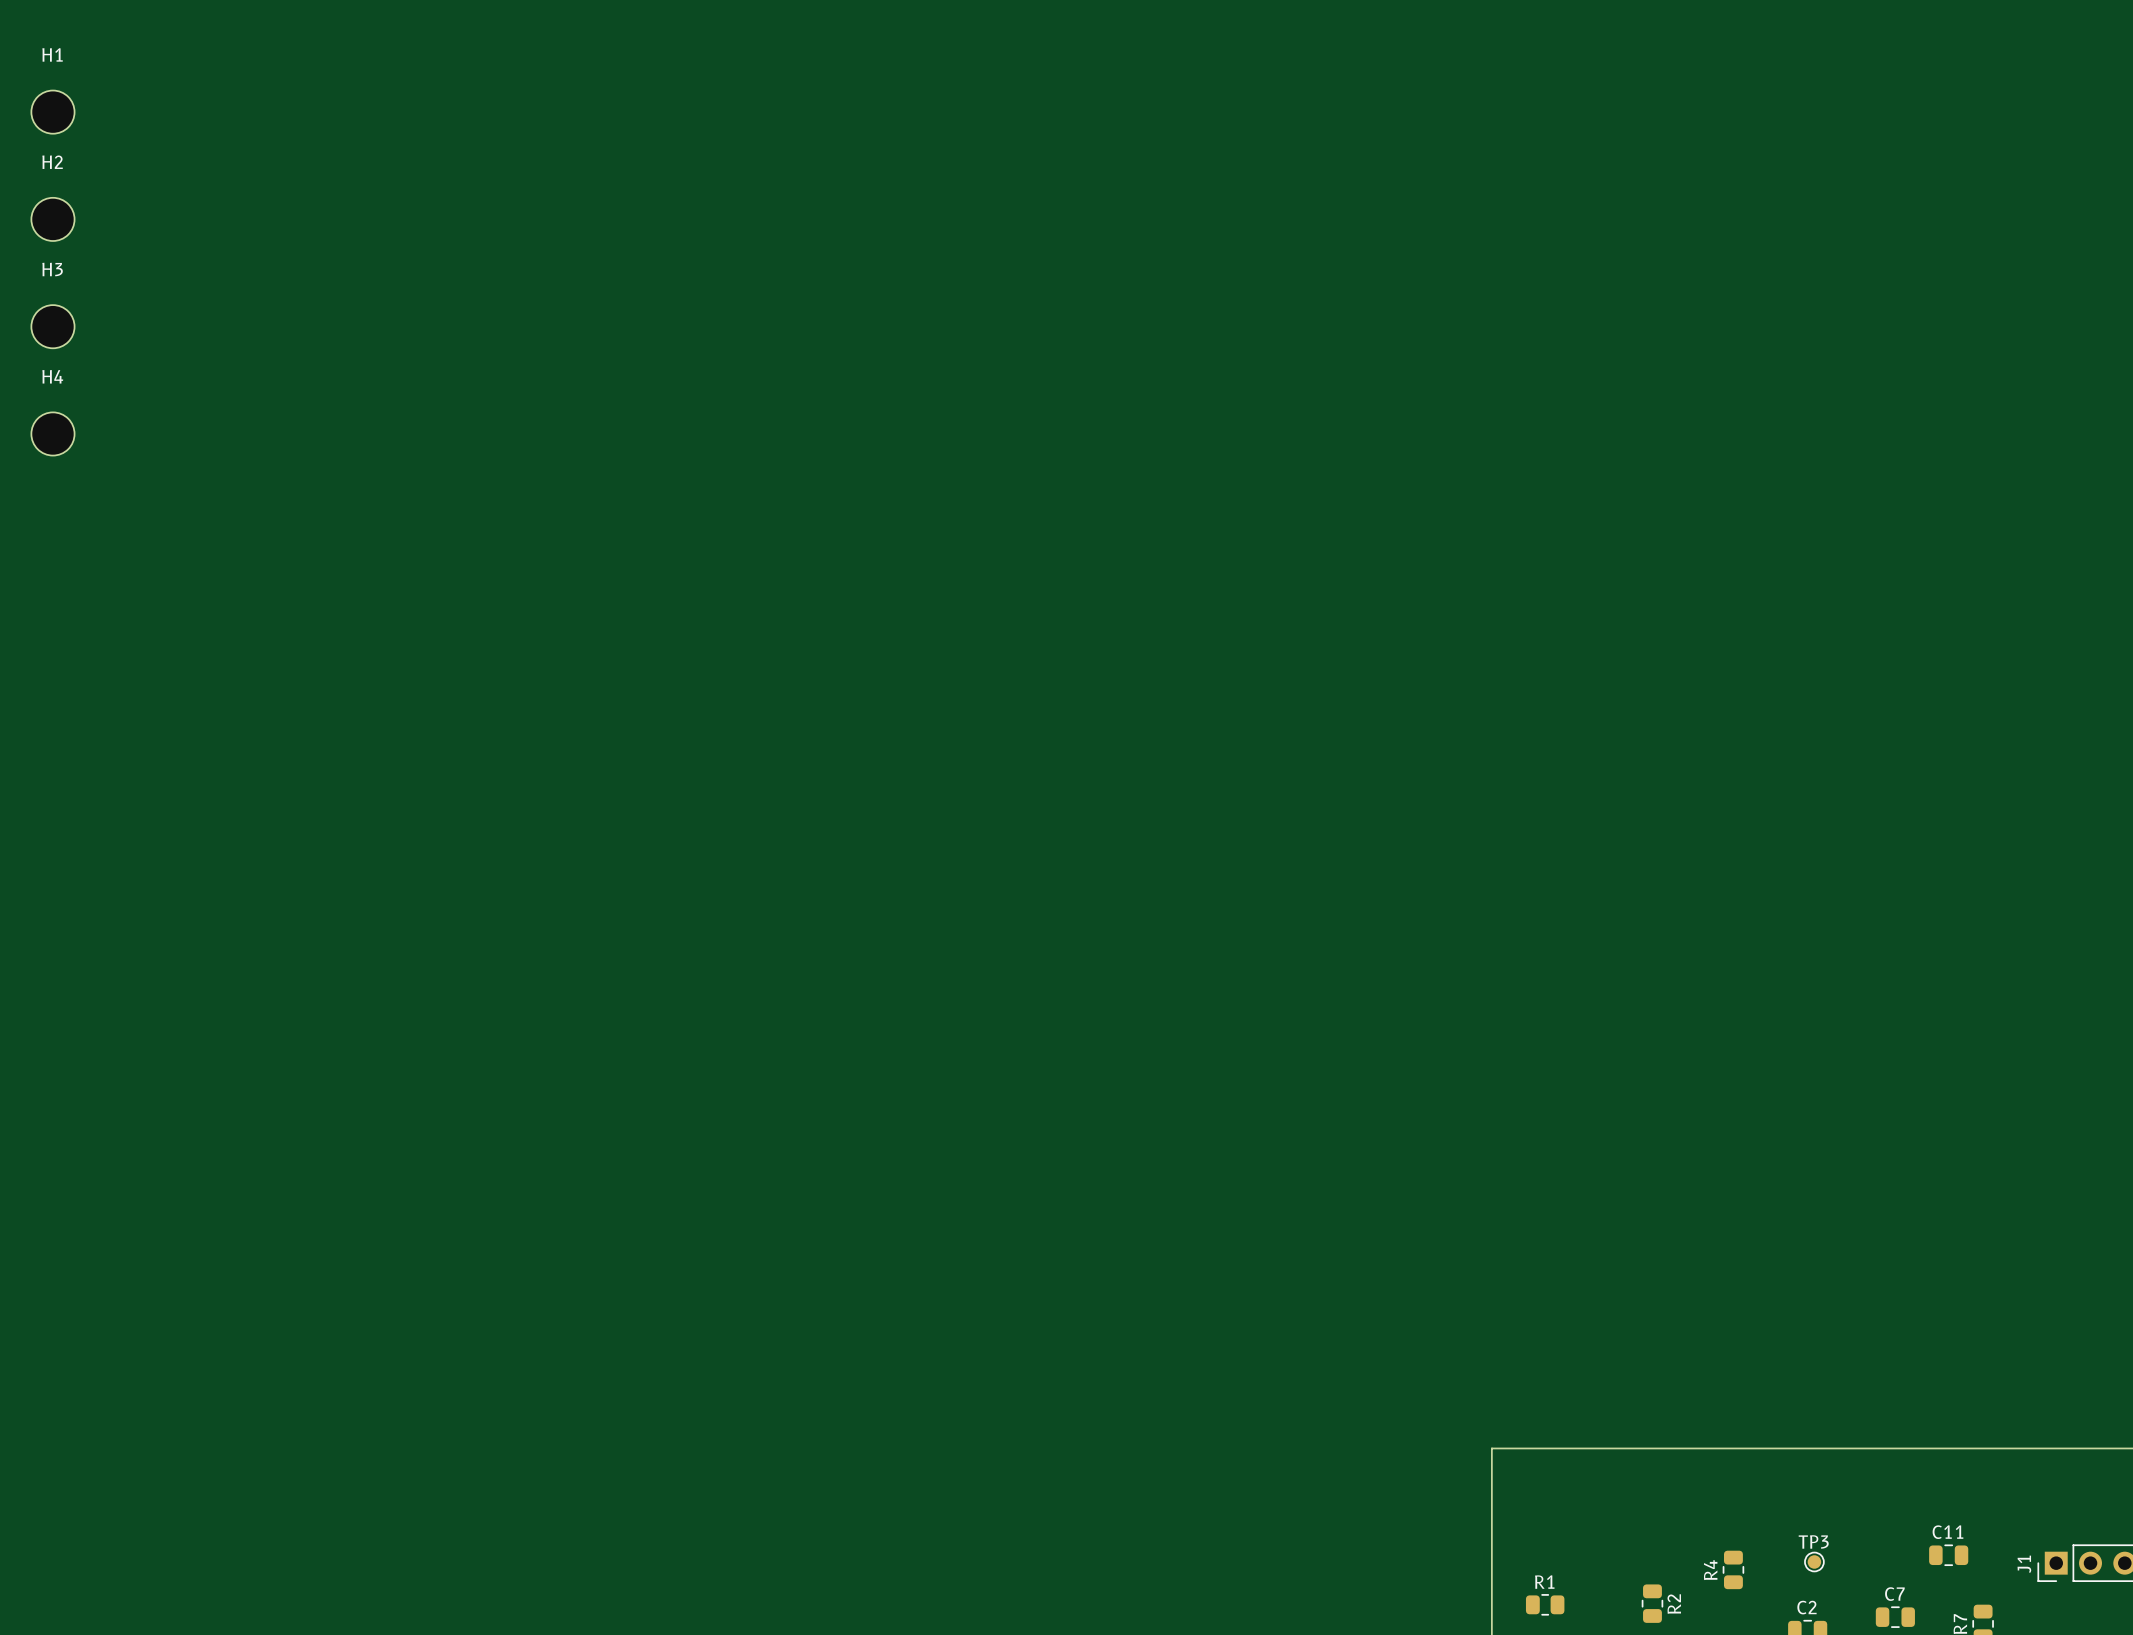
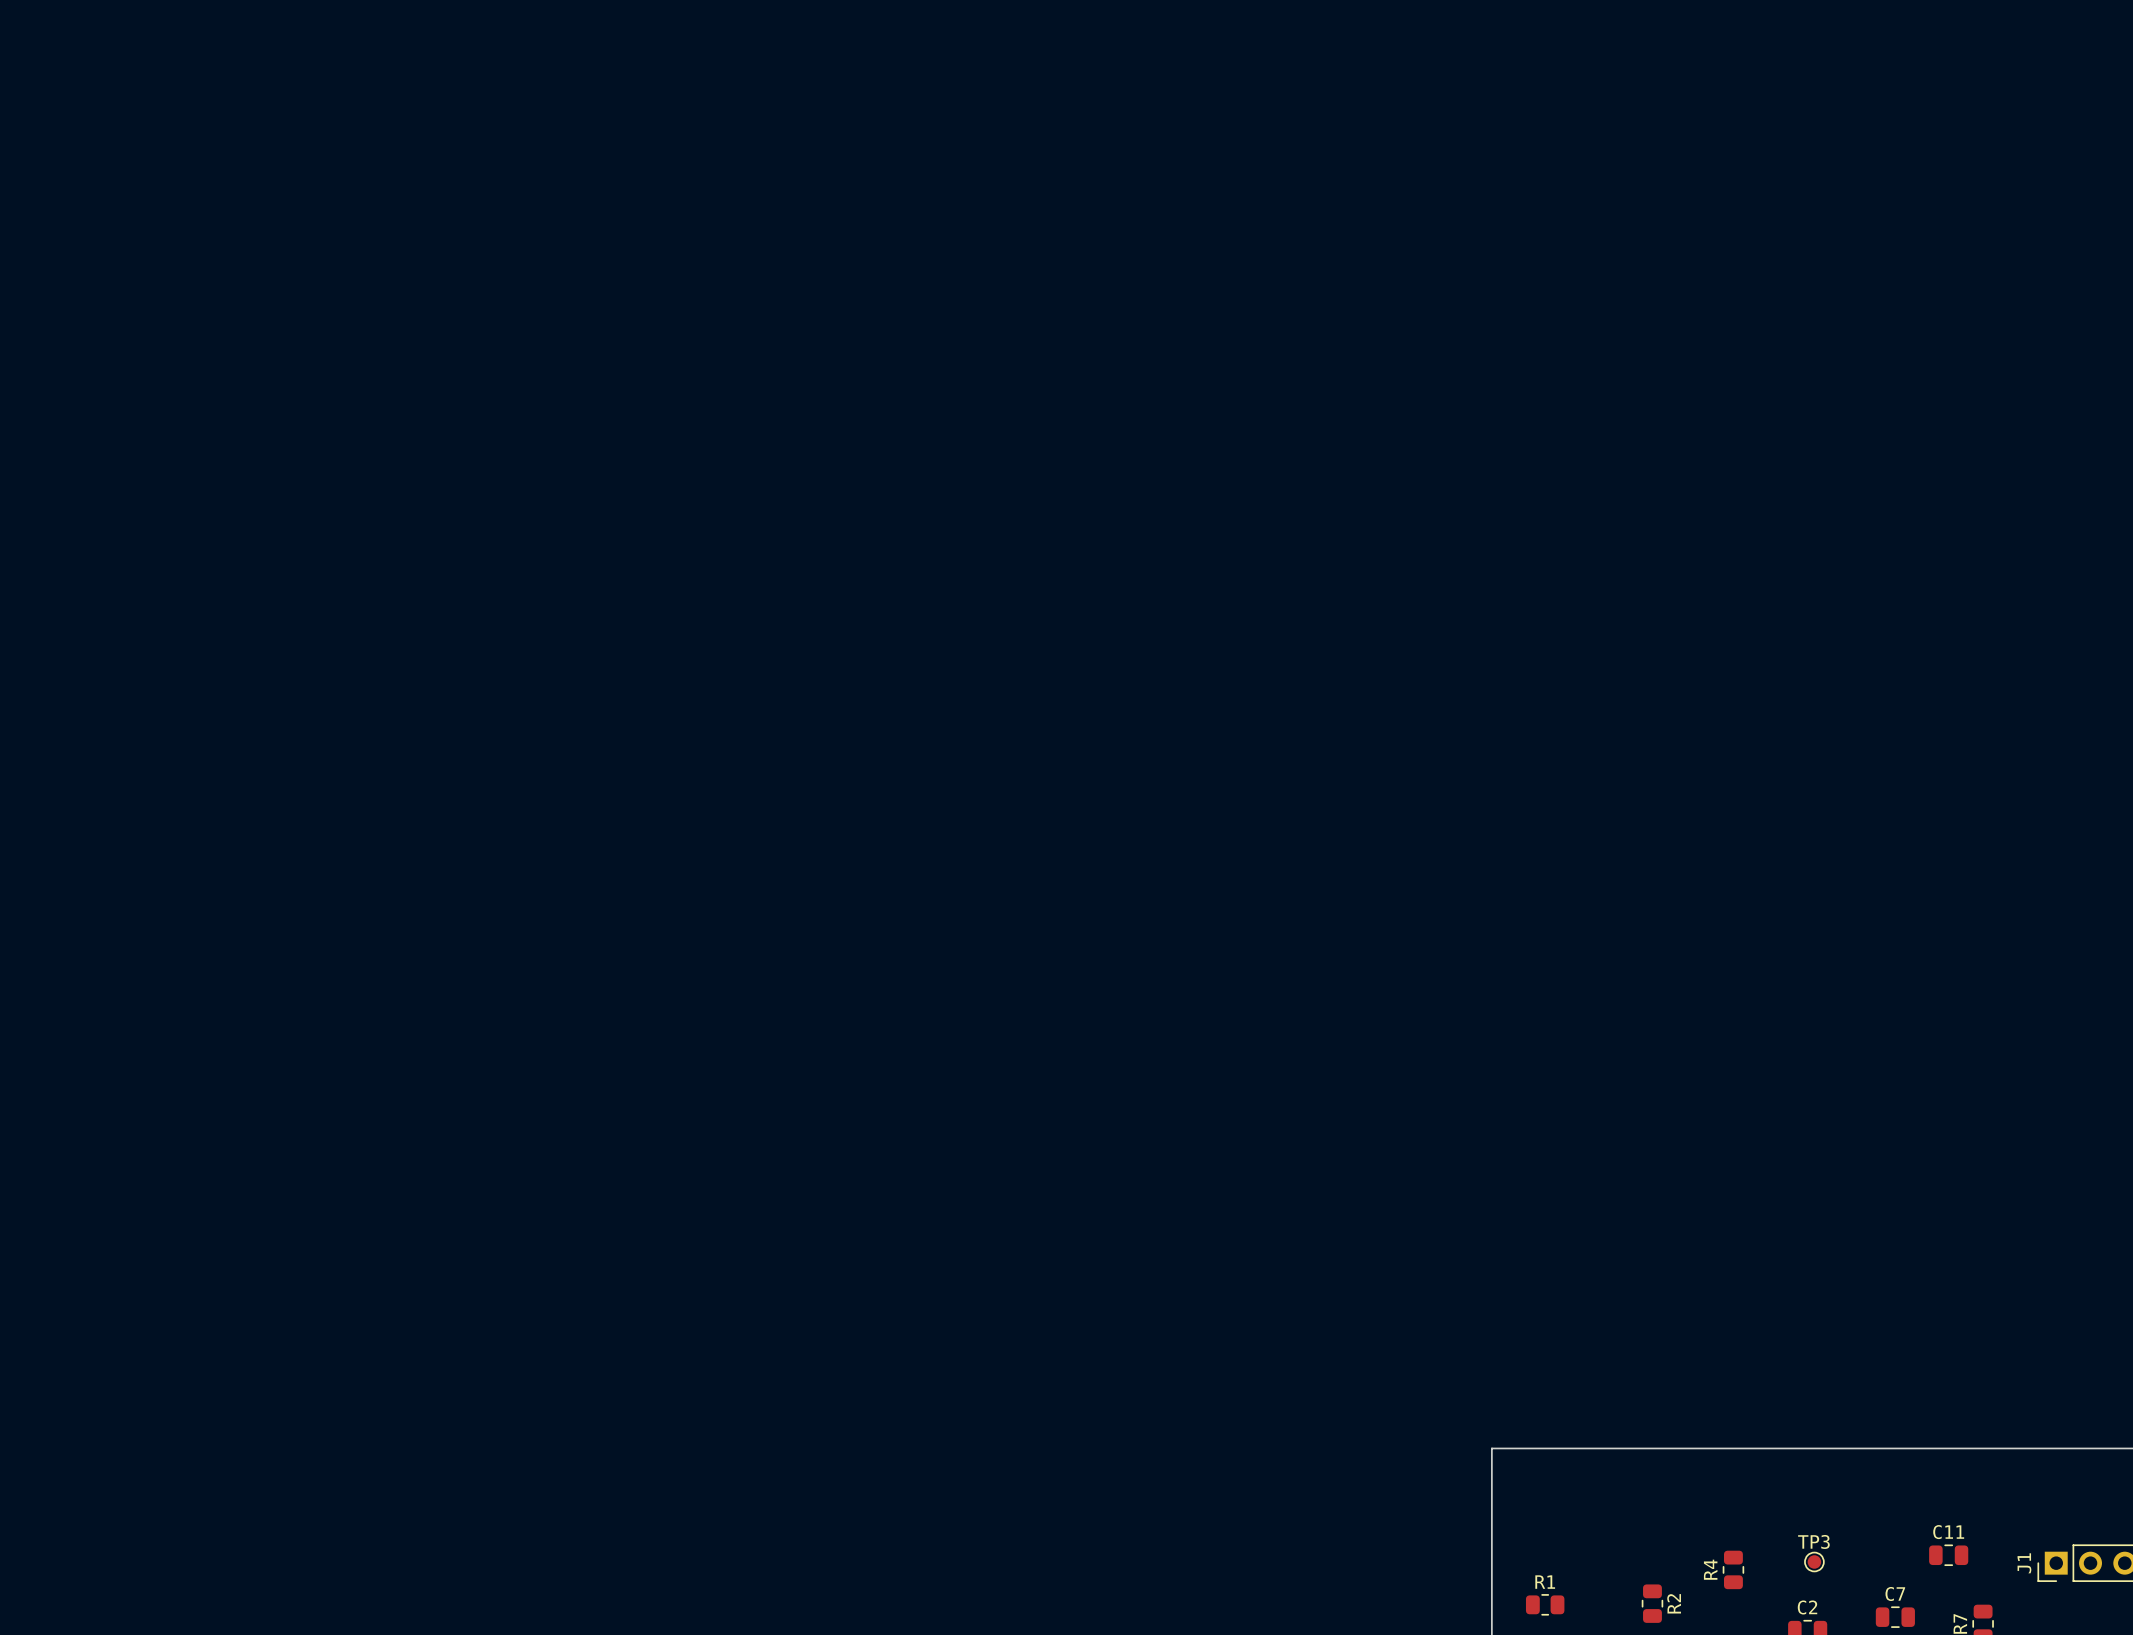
H1: (52, 112) -> none
H2: (52, 219) -> none
H3: (52, 326) -> none
H4: (52, 433) -> none

